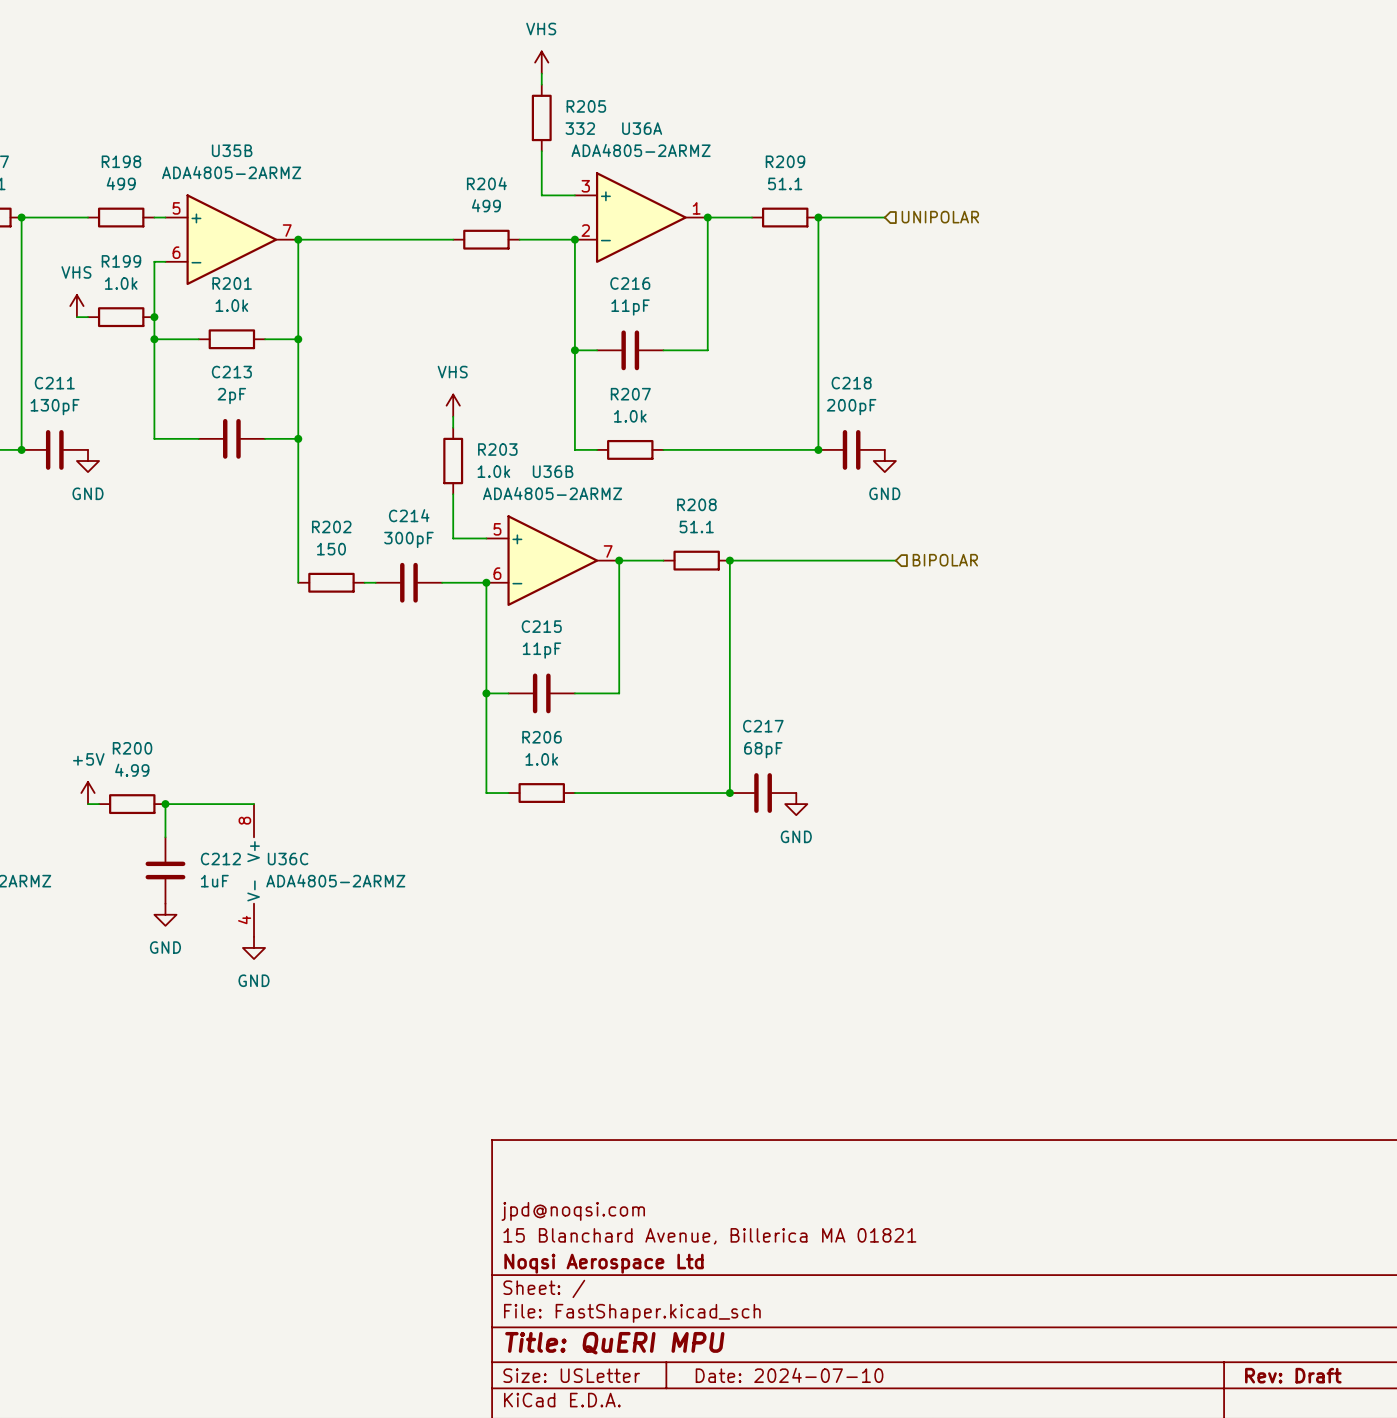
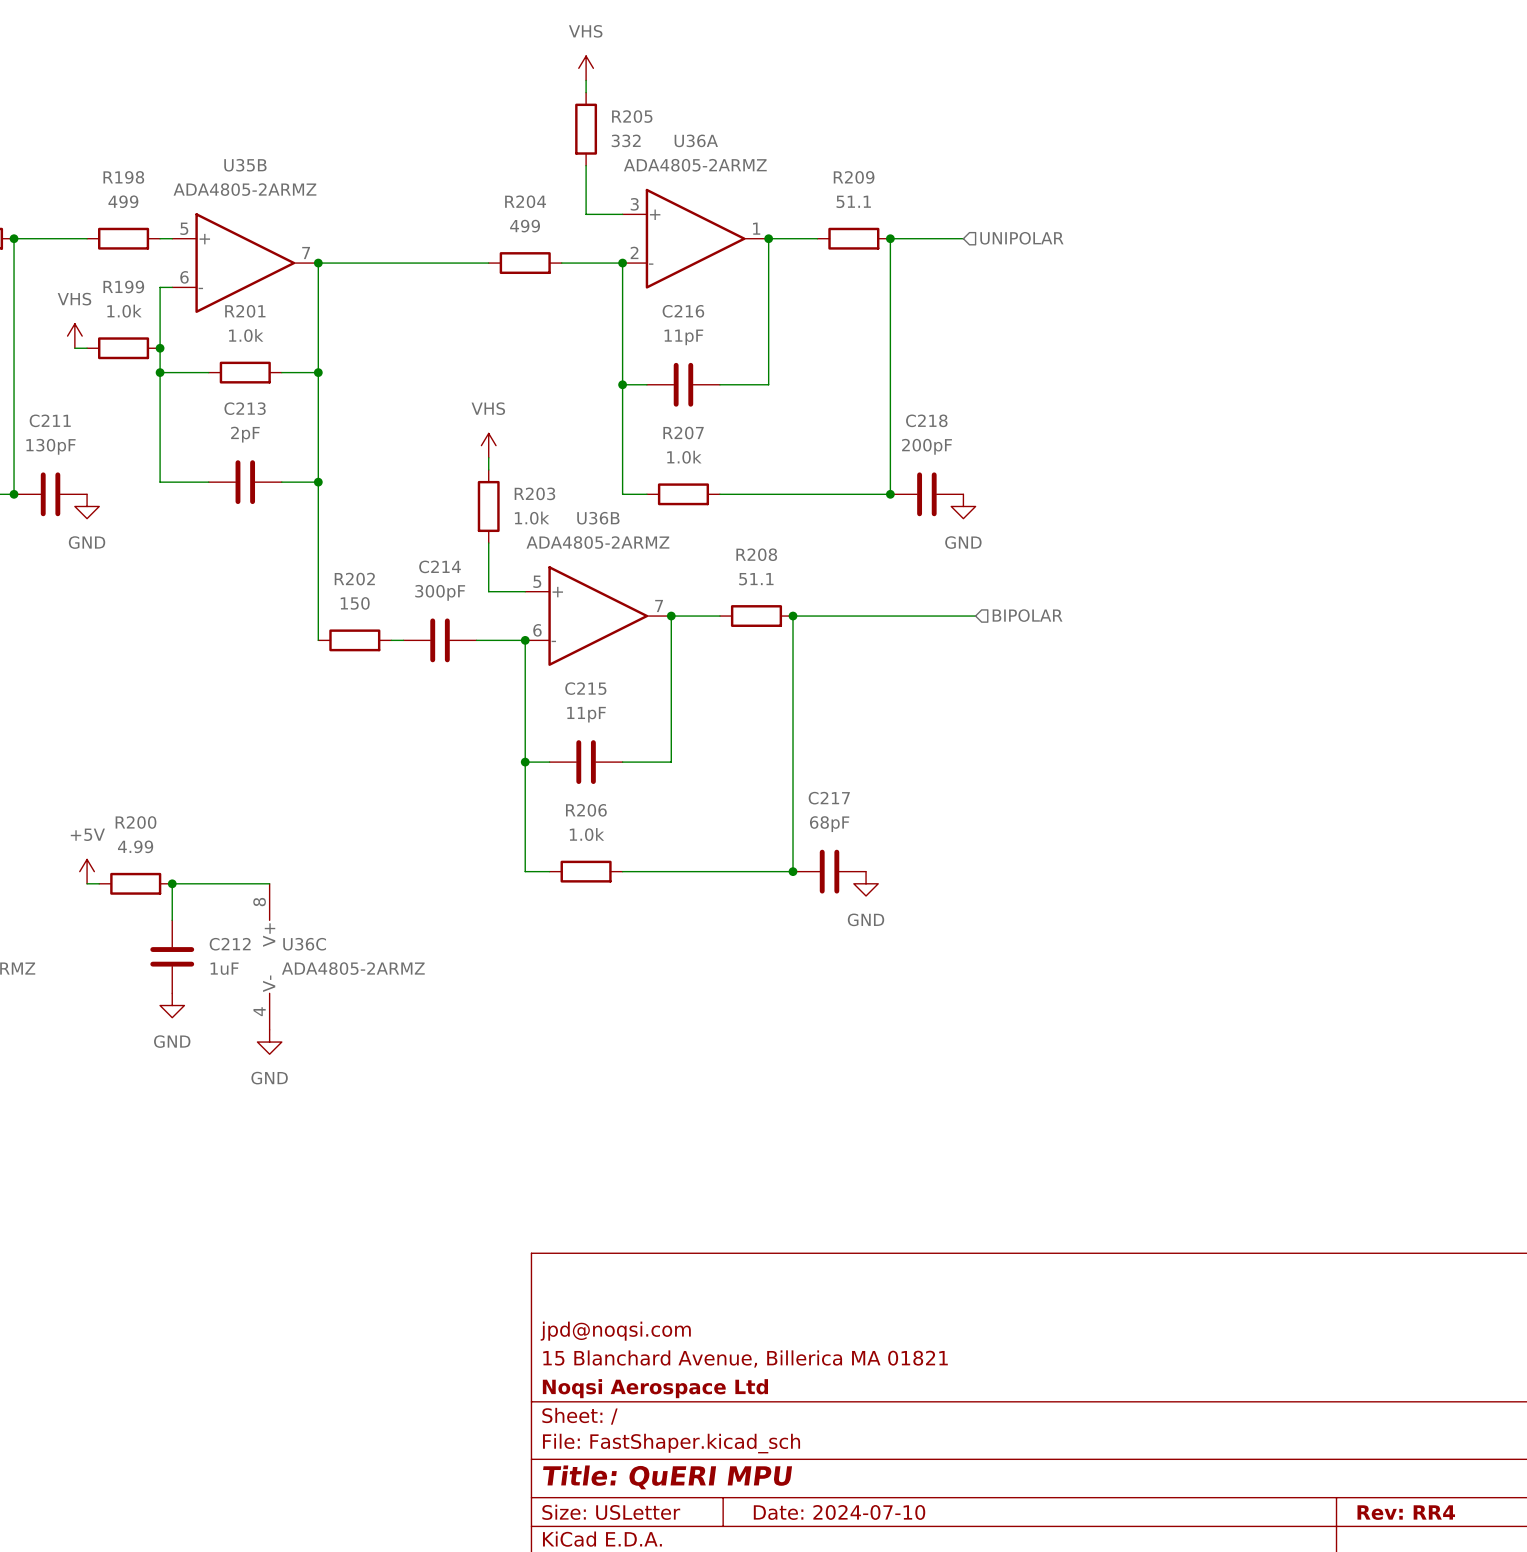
title block: Rev: Draft (1293, 1375) -> Rev: RR4 (1406, 1512)

